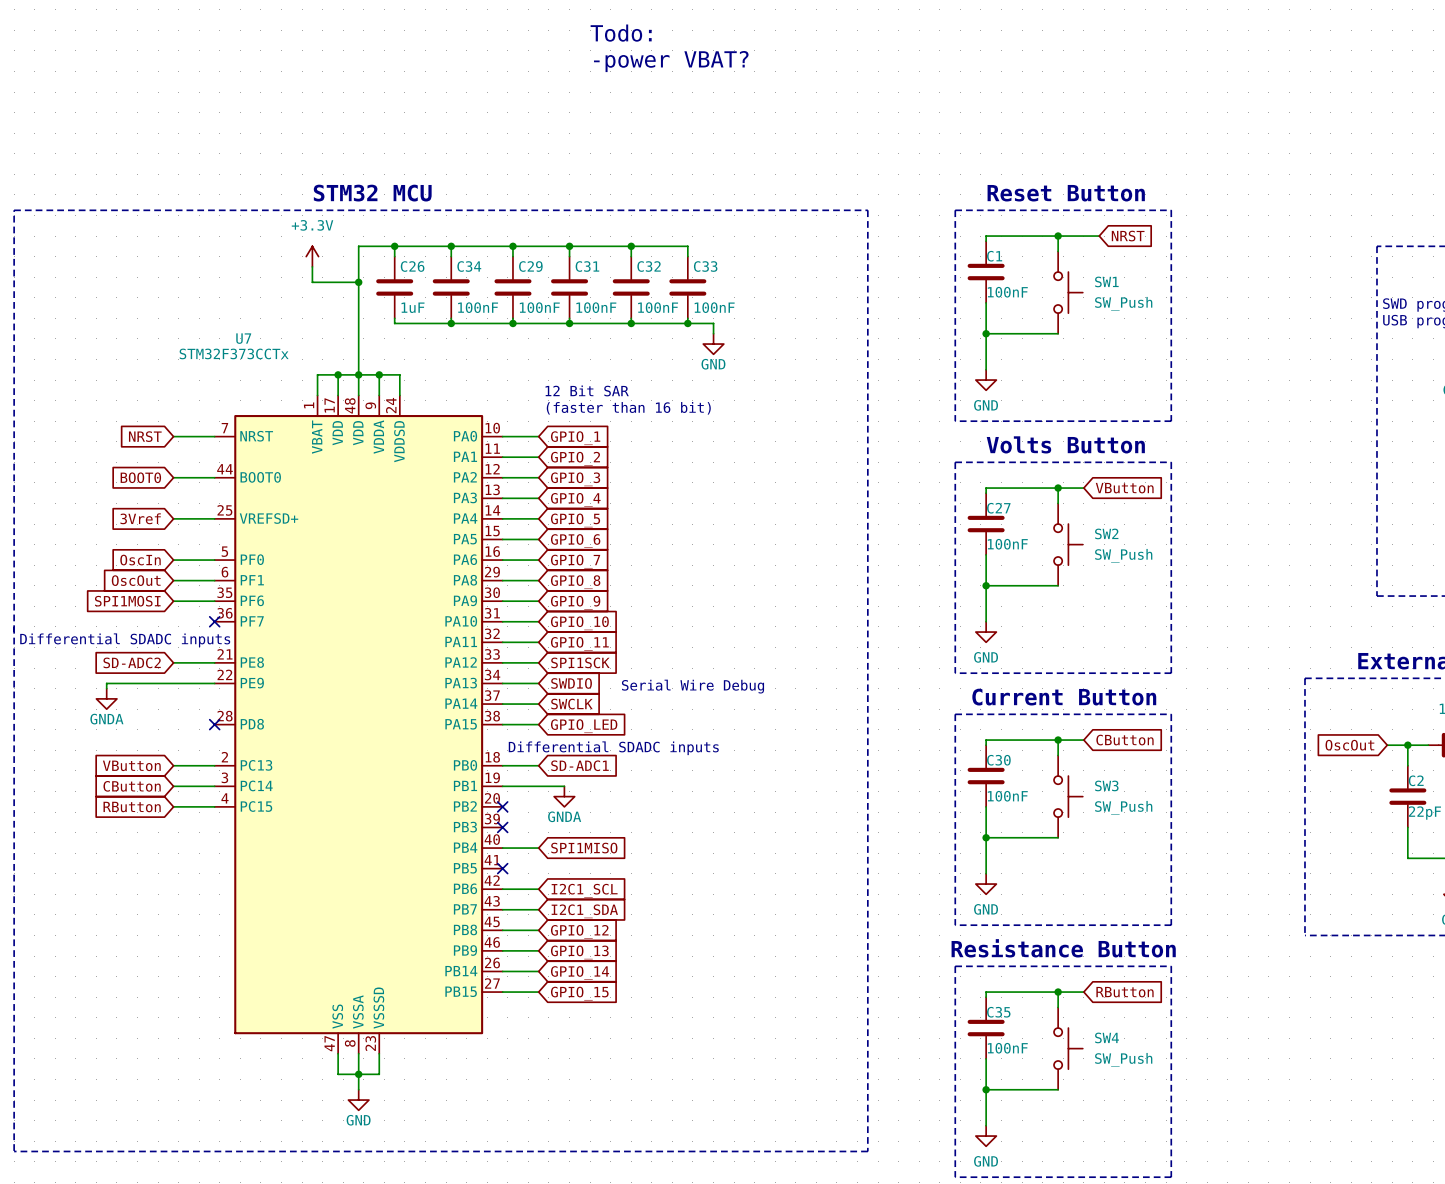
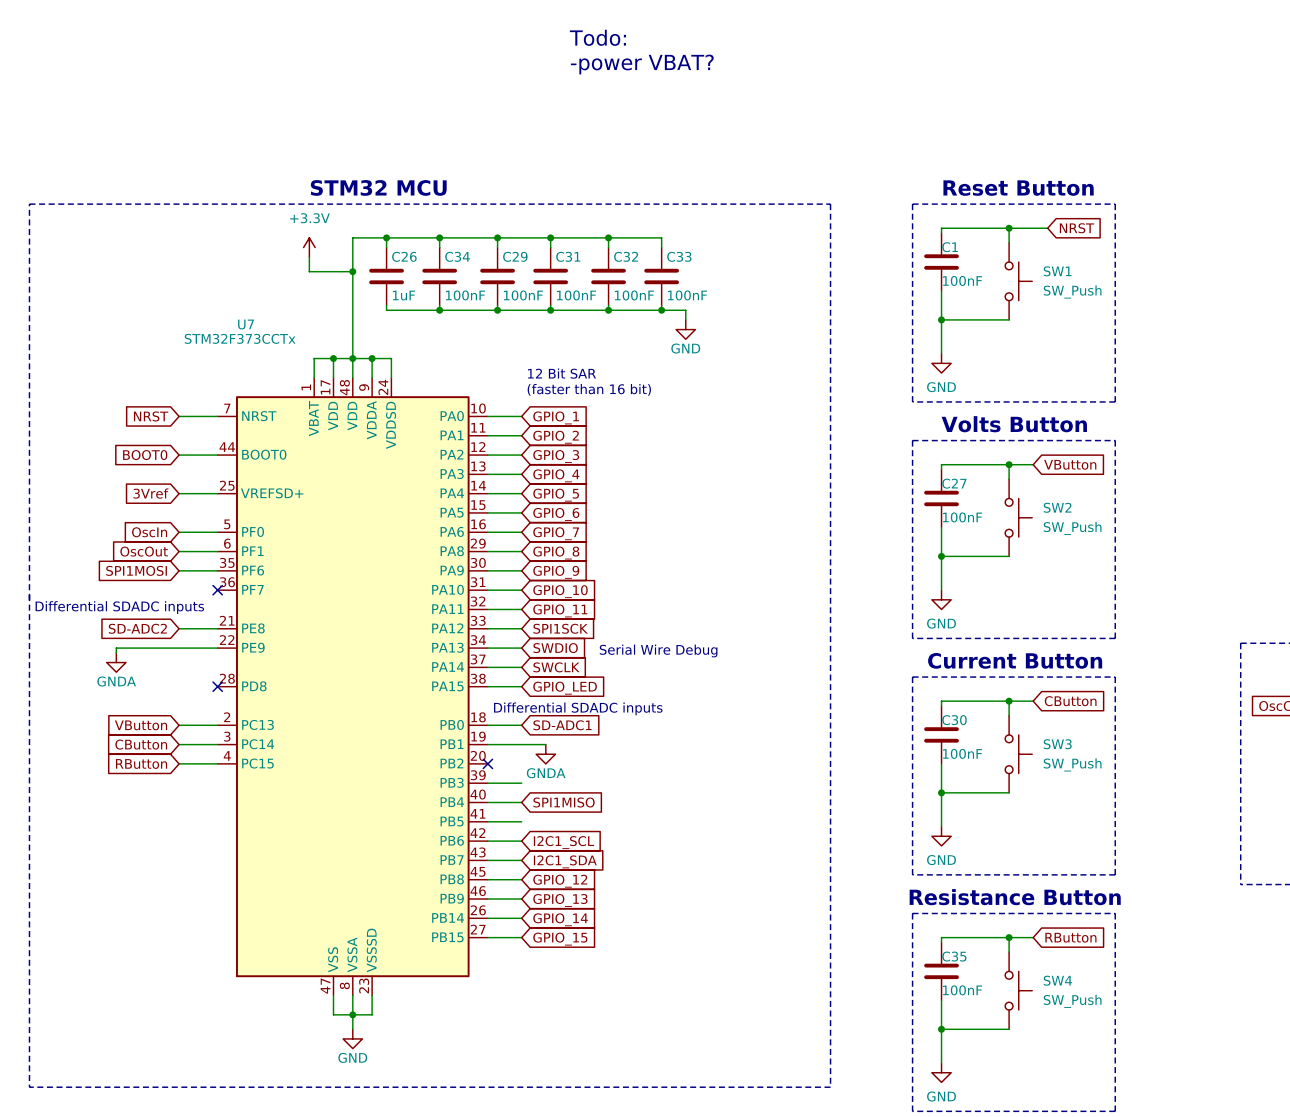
wire: none -> (487, 783) (521, 783)
no-connect mark: (502, 827) -> none
wire: none -> (487, 821) (521, 821)
no-connect mark: (502, 868) -> none

